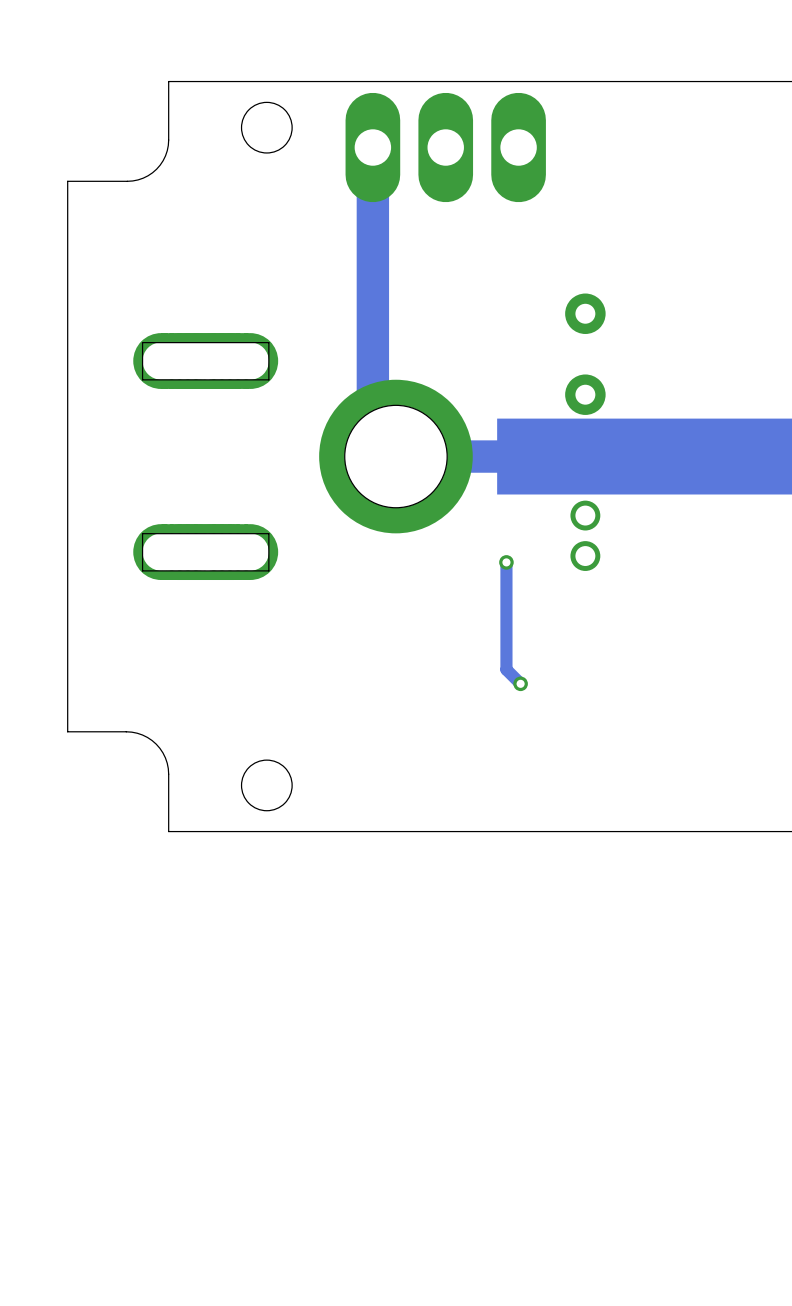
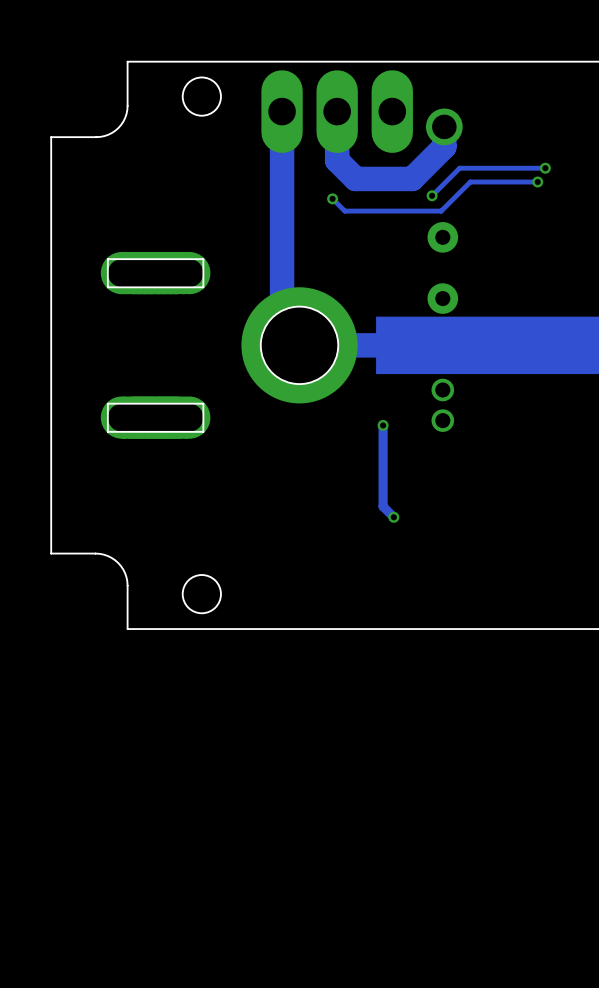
track: none -> (337, 111) (337, 160) (355, 178) (412, 178) (444, 146) (444, 126)
via: none -> (444, 126)
track: none -> (545, 168) (459, 168) (432, 195)
via: none -> (545, 168)
track: none -> (537, 182) (470, 182) (441, 211) (344, 211) (332, 198)
via: none -> (537, 182)
via: none -> (432, 195)
via: none -> (332, 198)

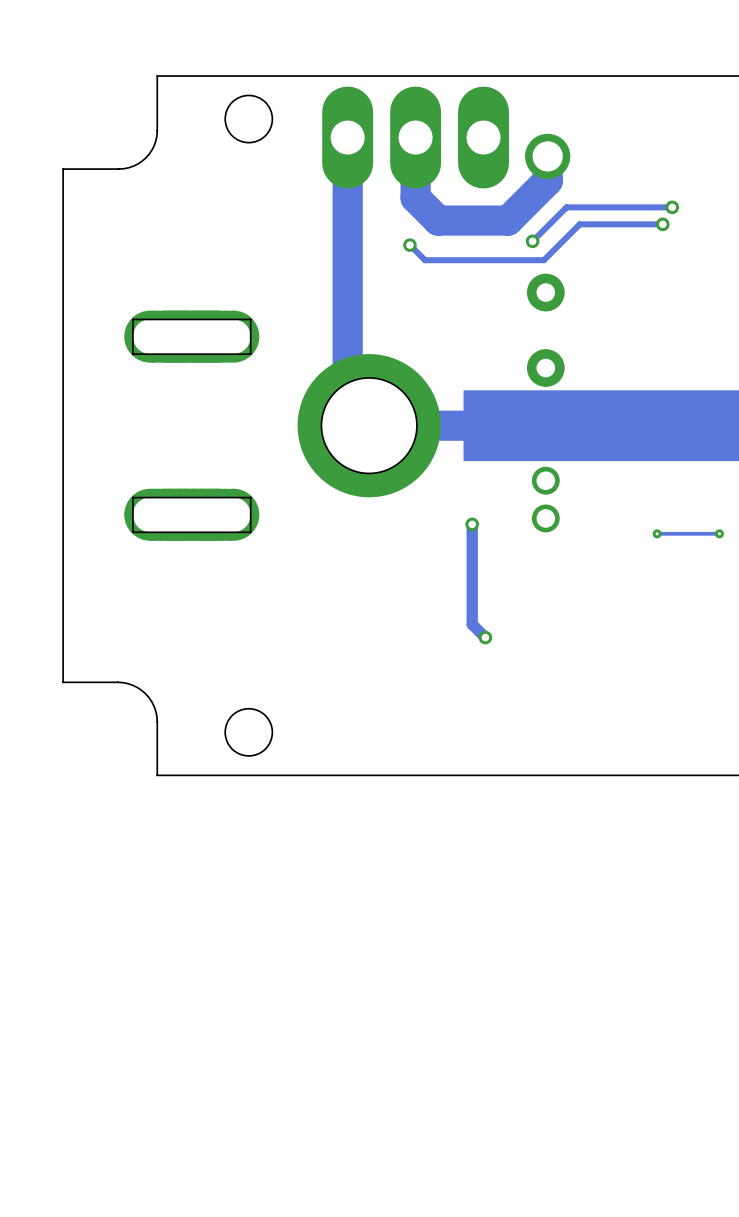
via: none -> (657, 533)
track: none -> (719, 533) (657, 533)
via: none -> (719, 533)

